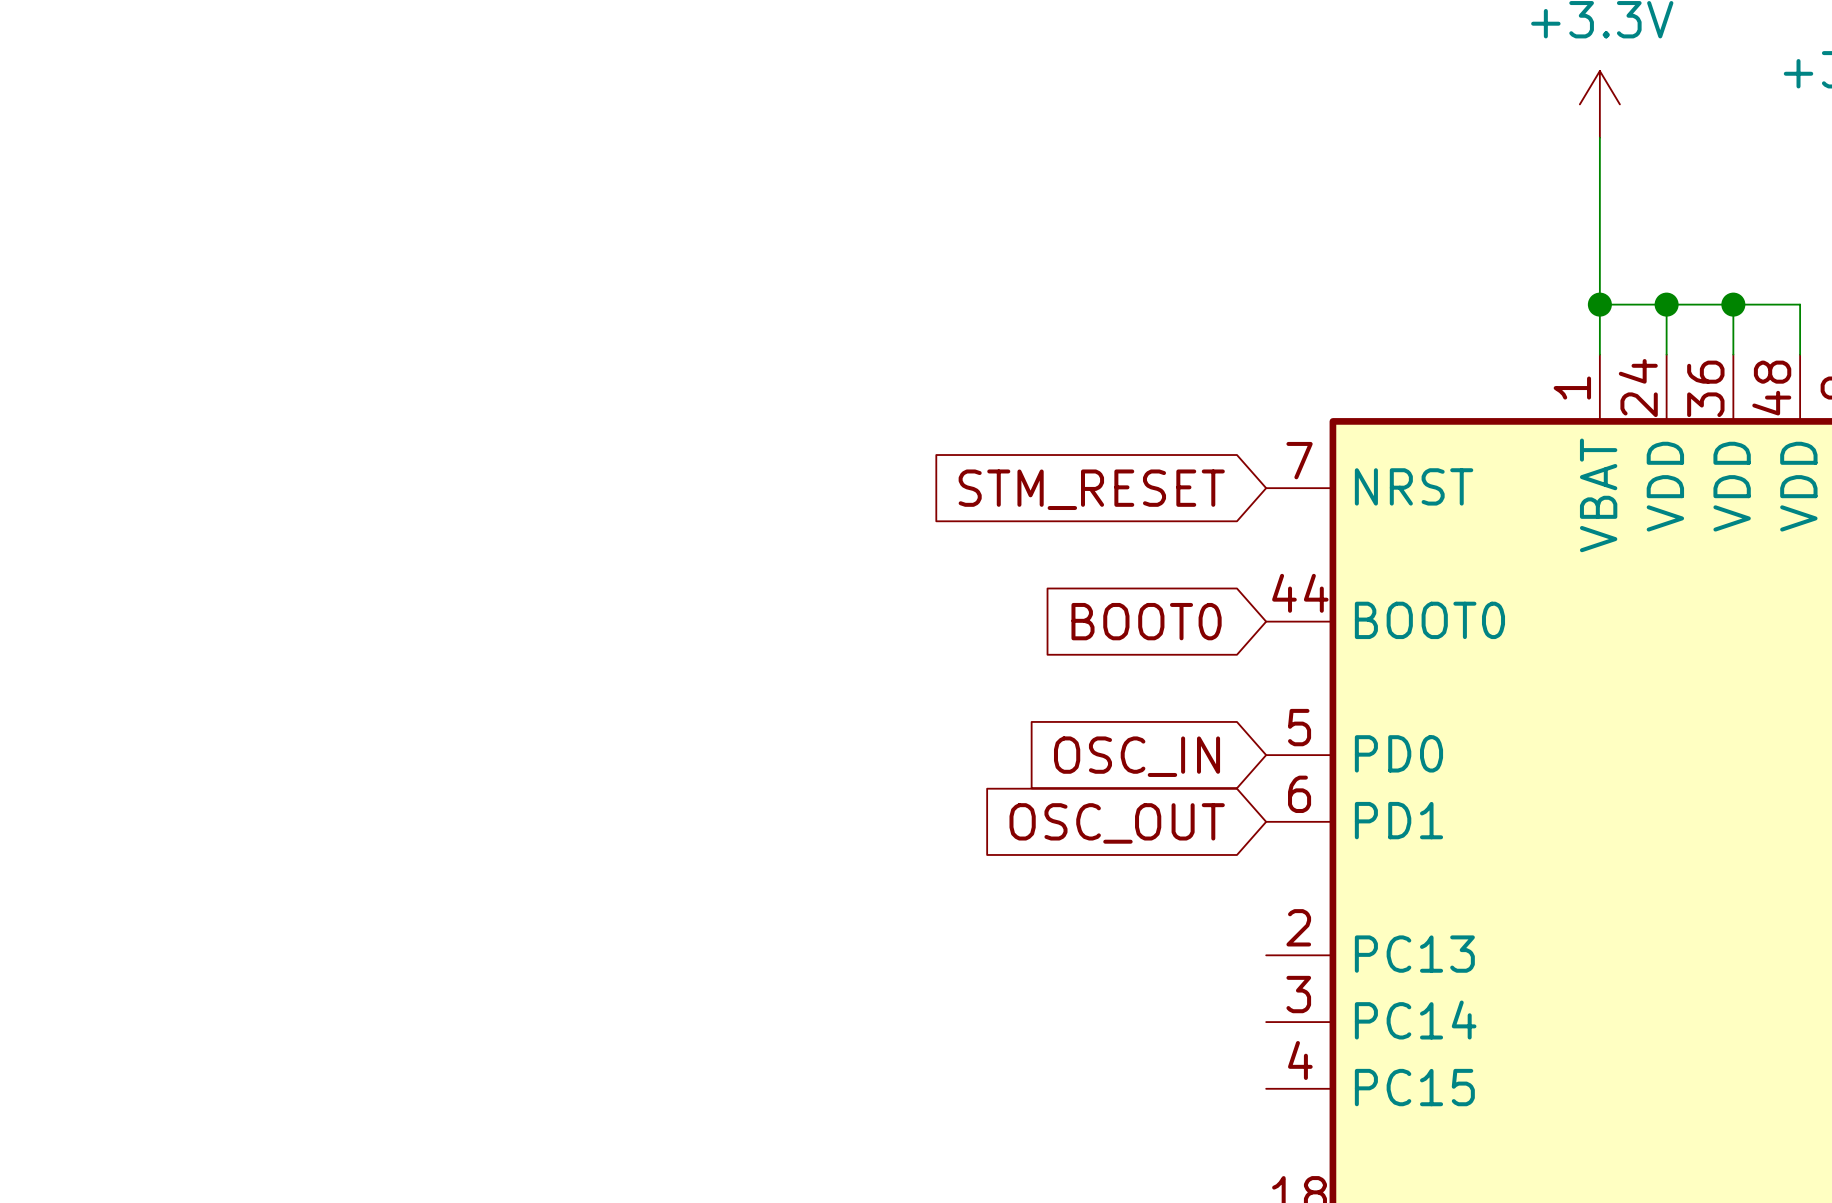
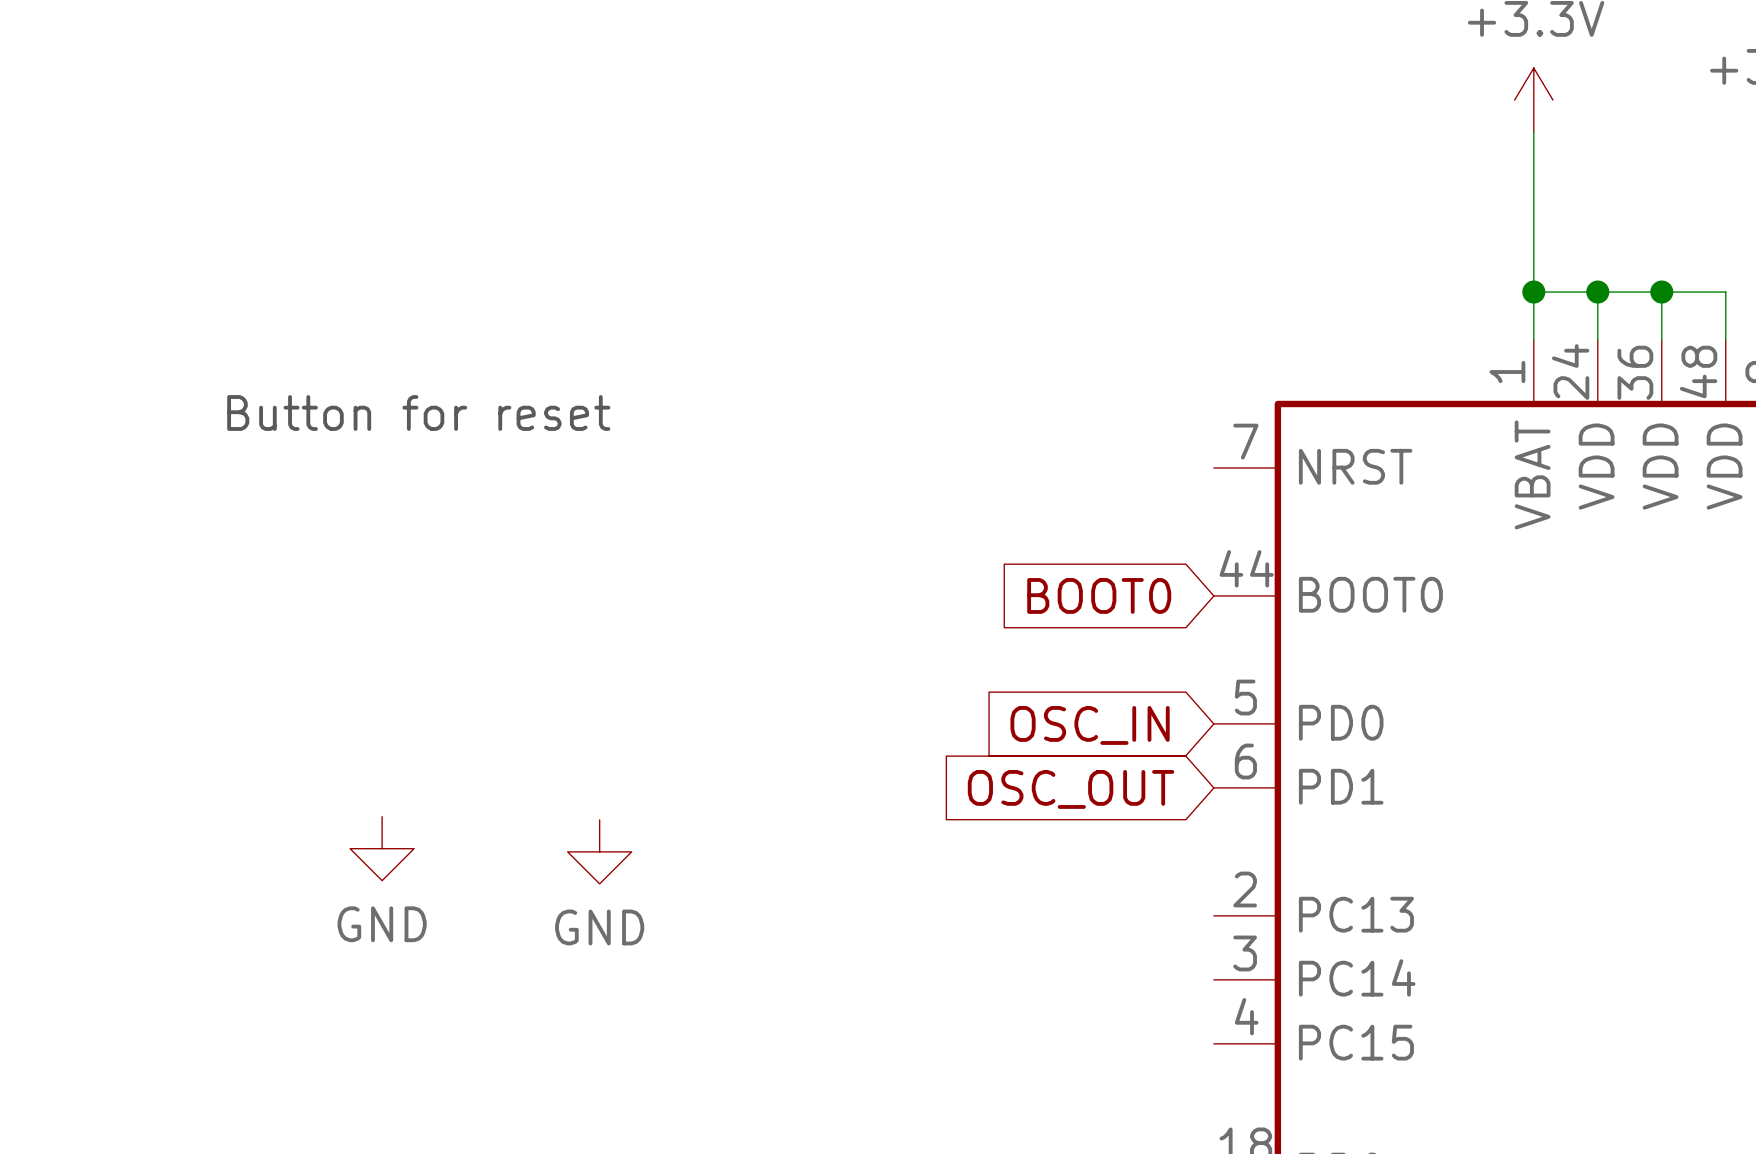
text: none -> Button for reset (418, 412)
global label: STM_RESET (1091, 489) -> none
power symbol: none -> GND (382, 848)
power symbol: none -> GND (599, 851)

